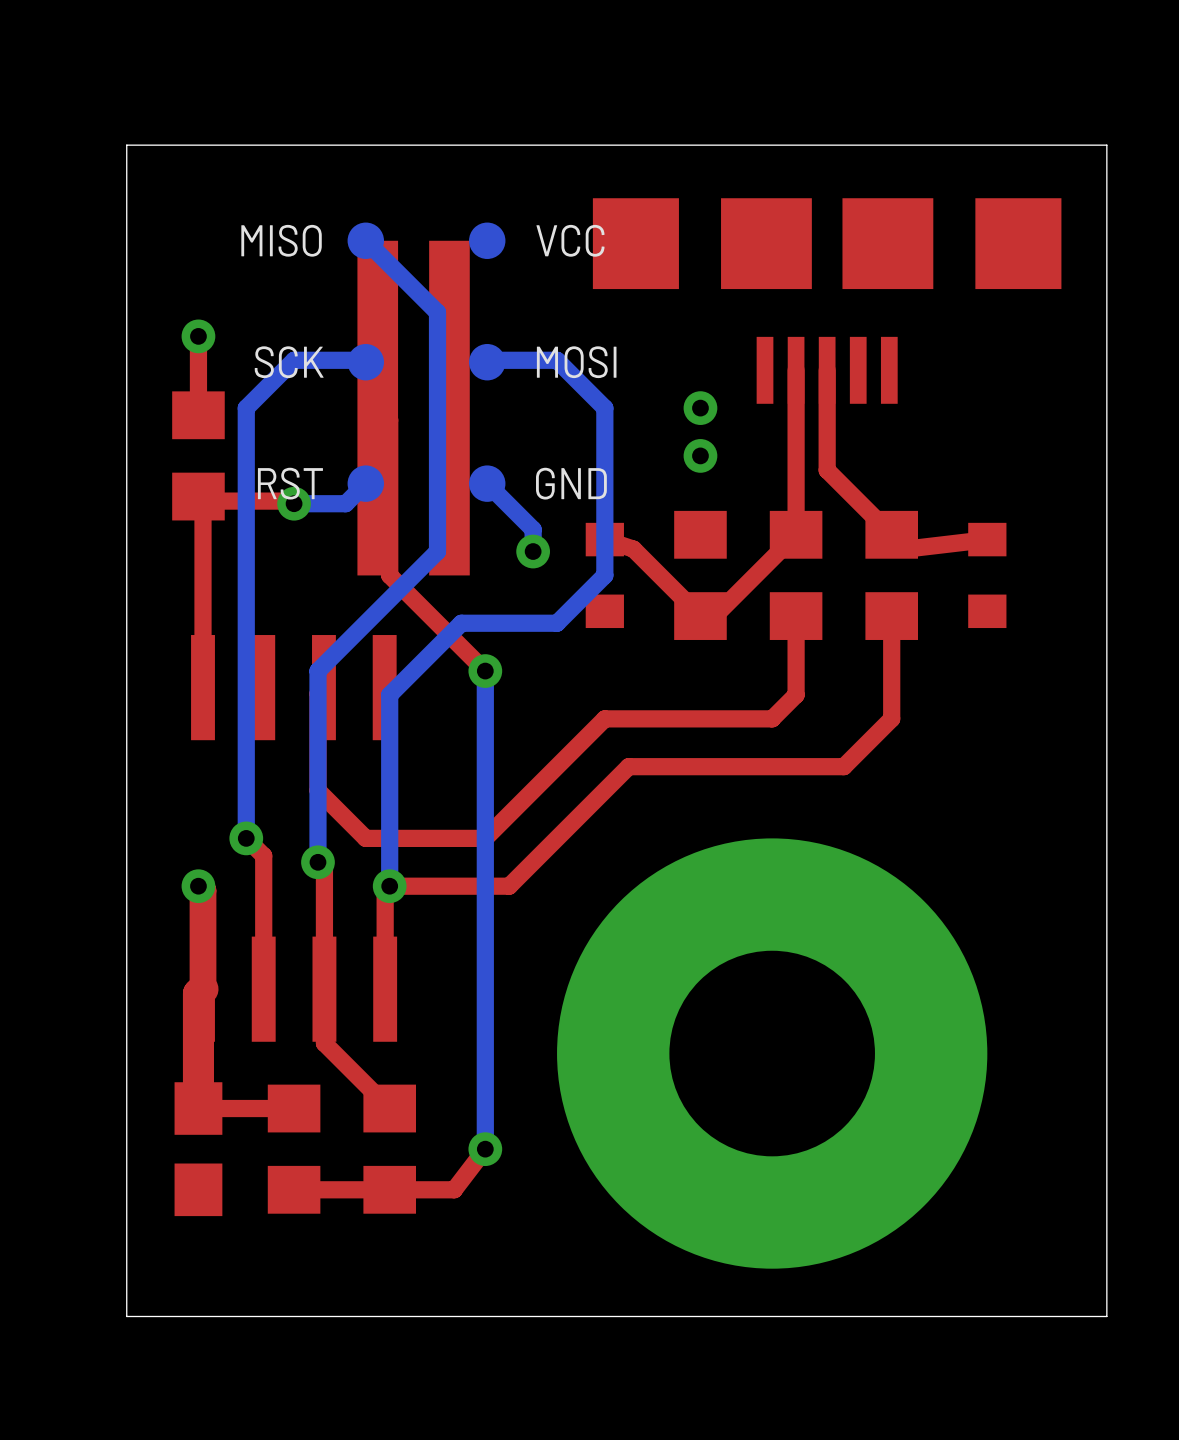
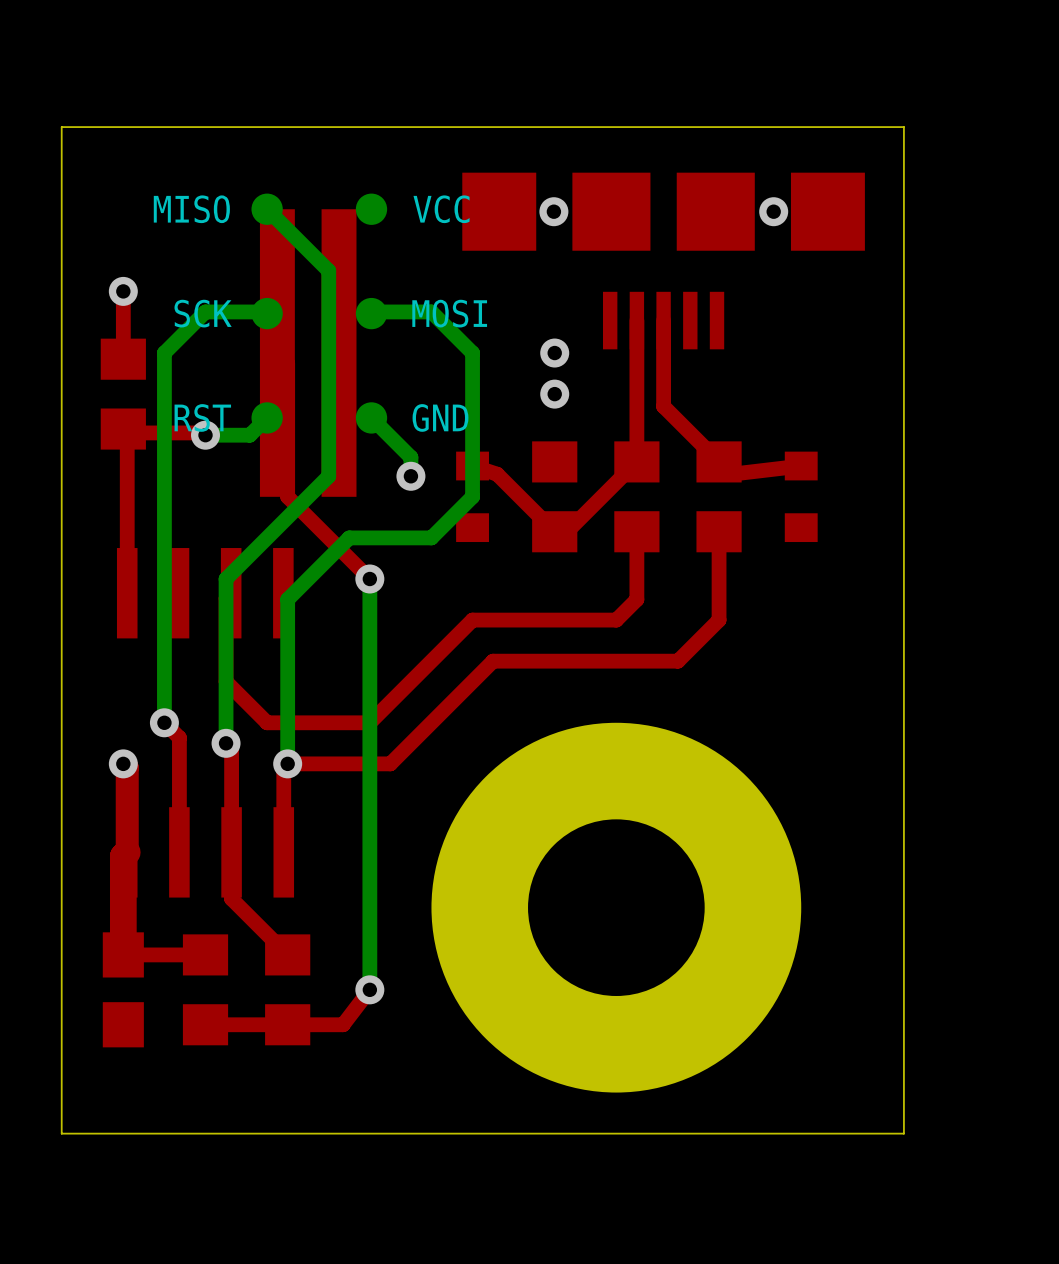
via: none -> (553, 211)
via: none -> (773, 211)

